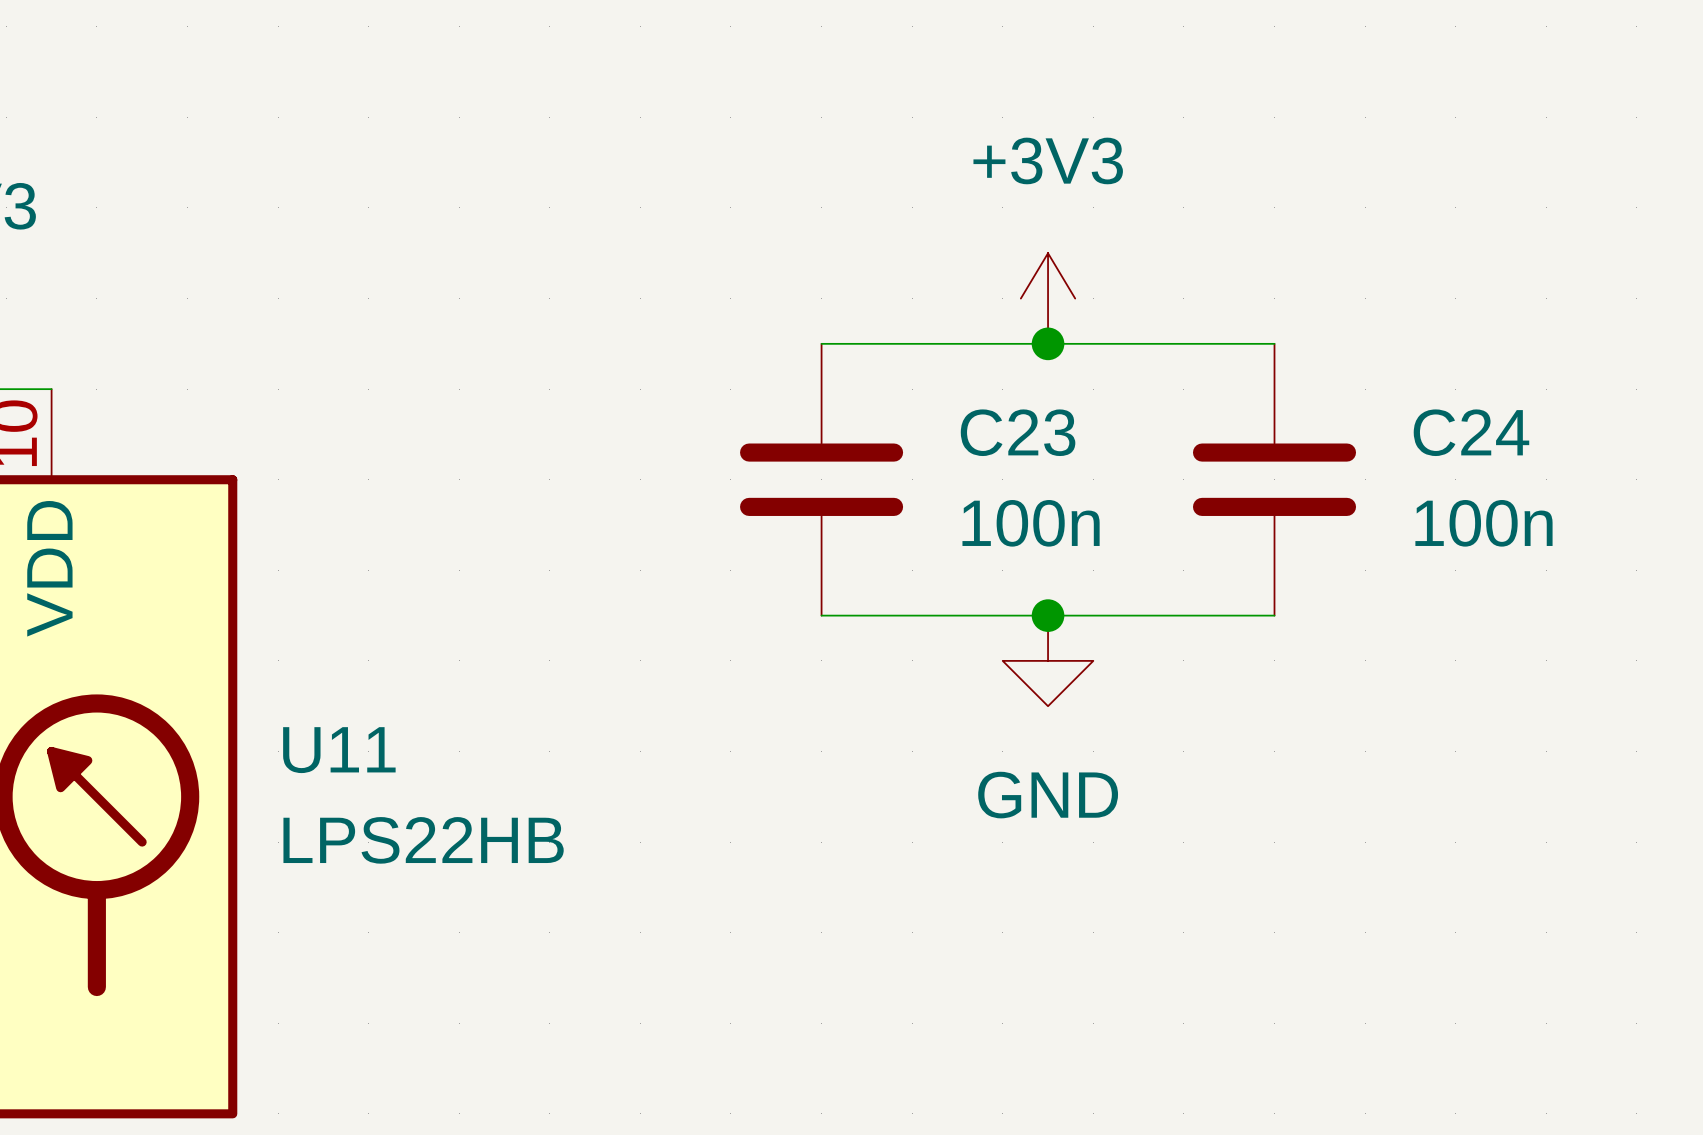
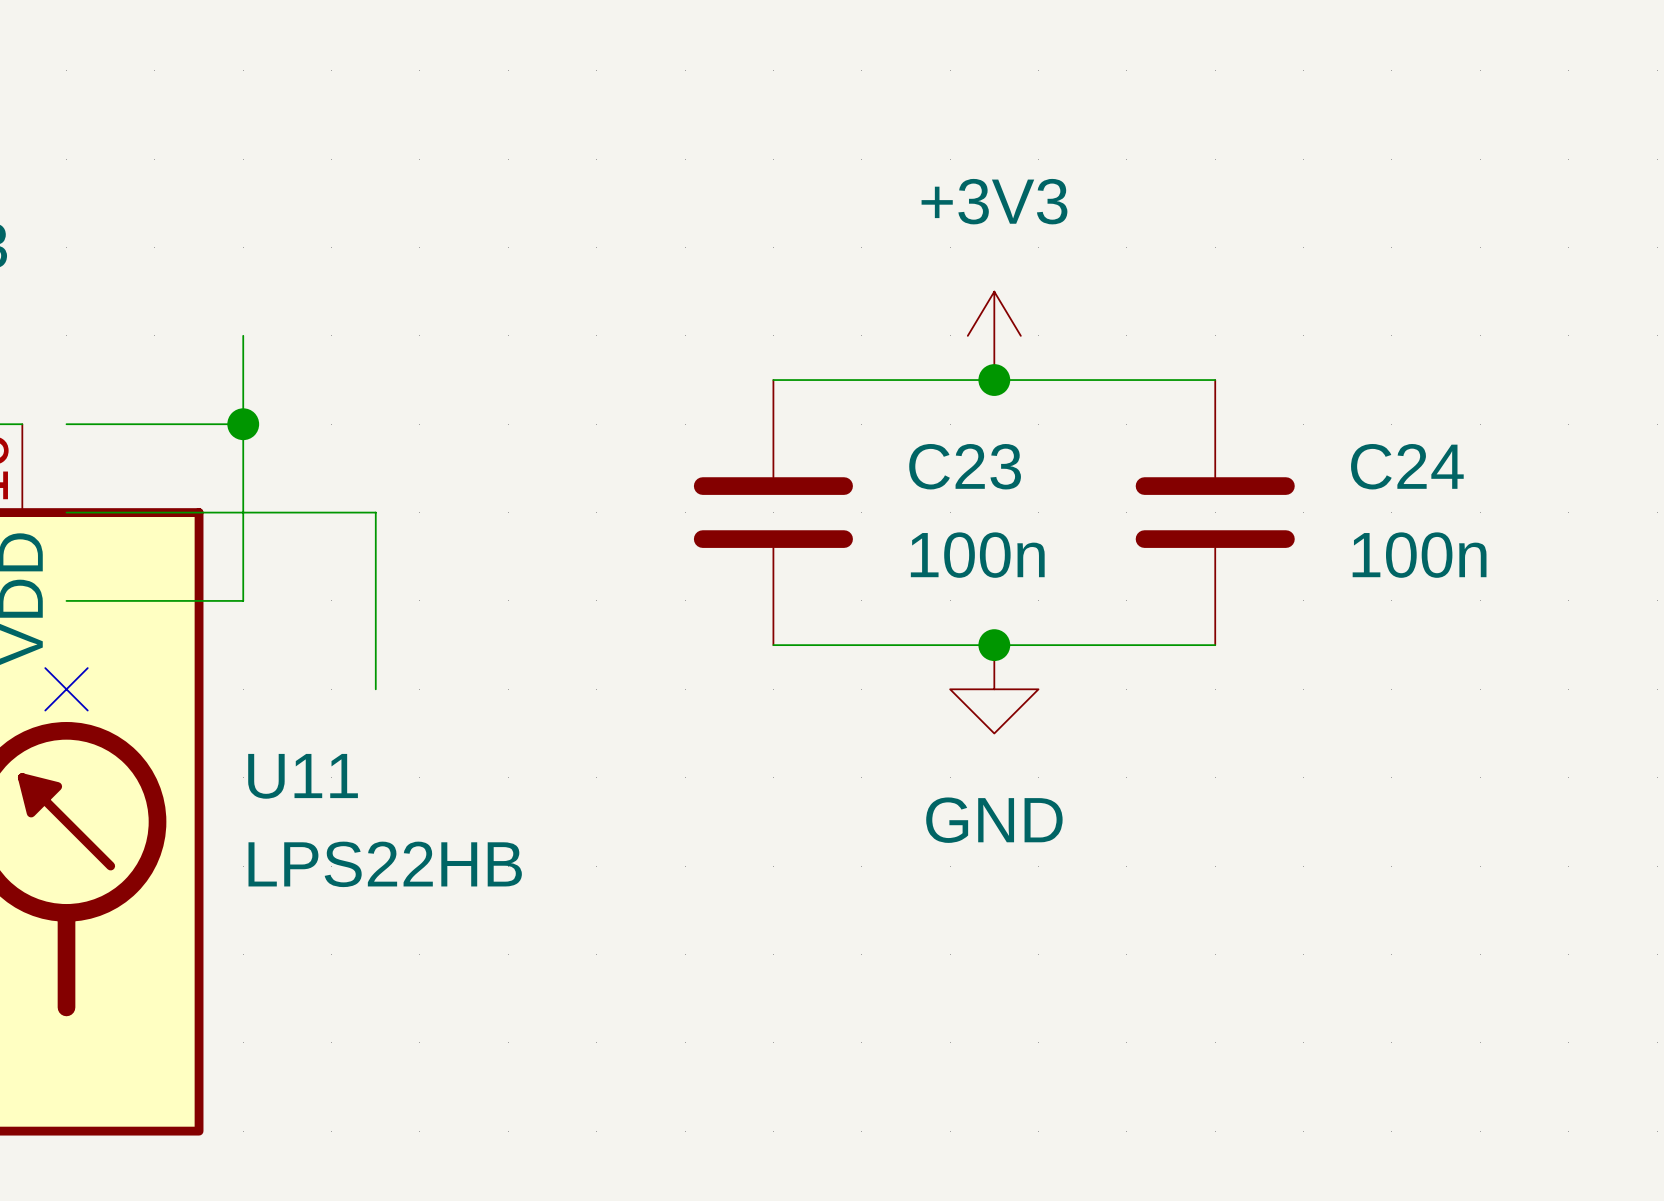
wire: none -> (243, 335) (243, 600) (66, 600)
wire: none -> (66, 424) (243, 424)
junction: none -> (243, 424)
wire: none -> (66, 512) (375, 512) (375, 689)
no-connect mark: none -> (66, 689)

